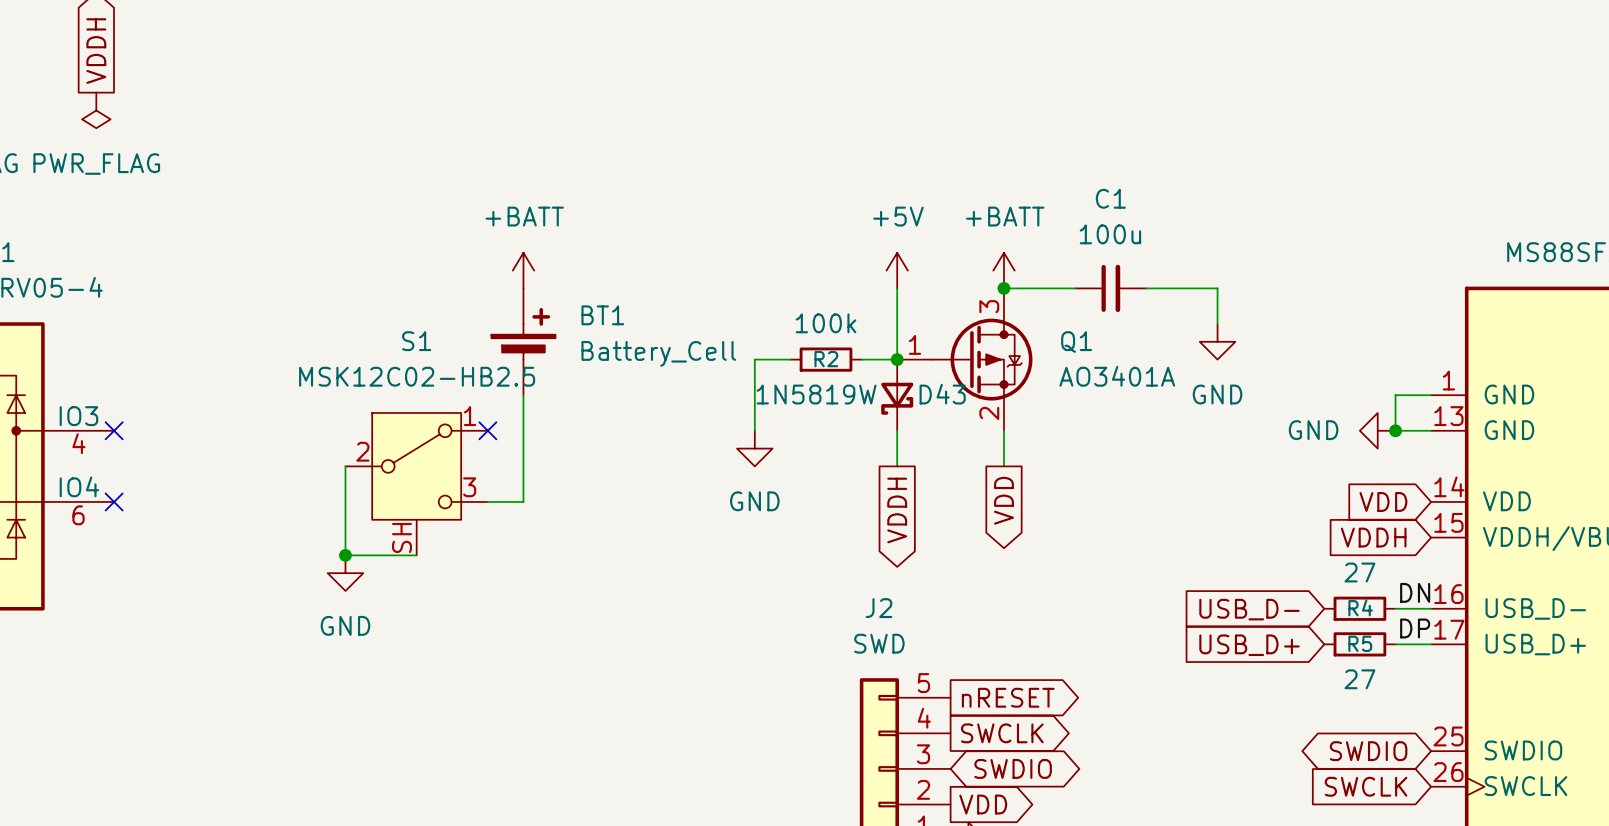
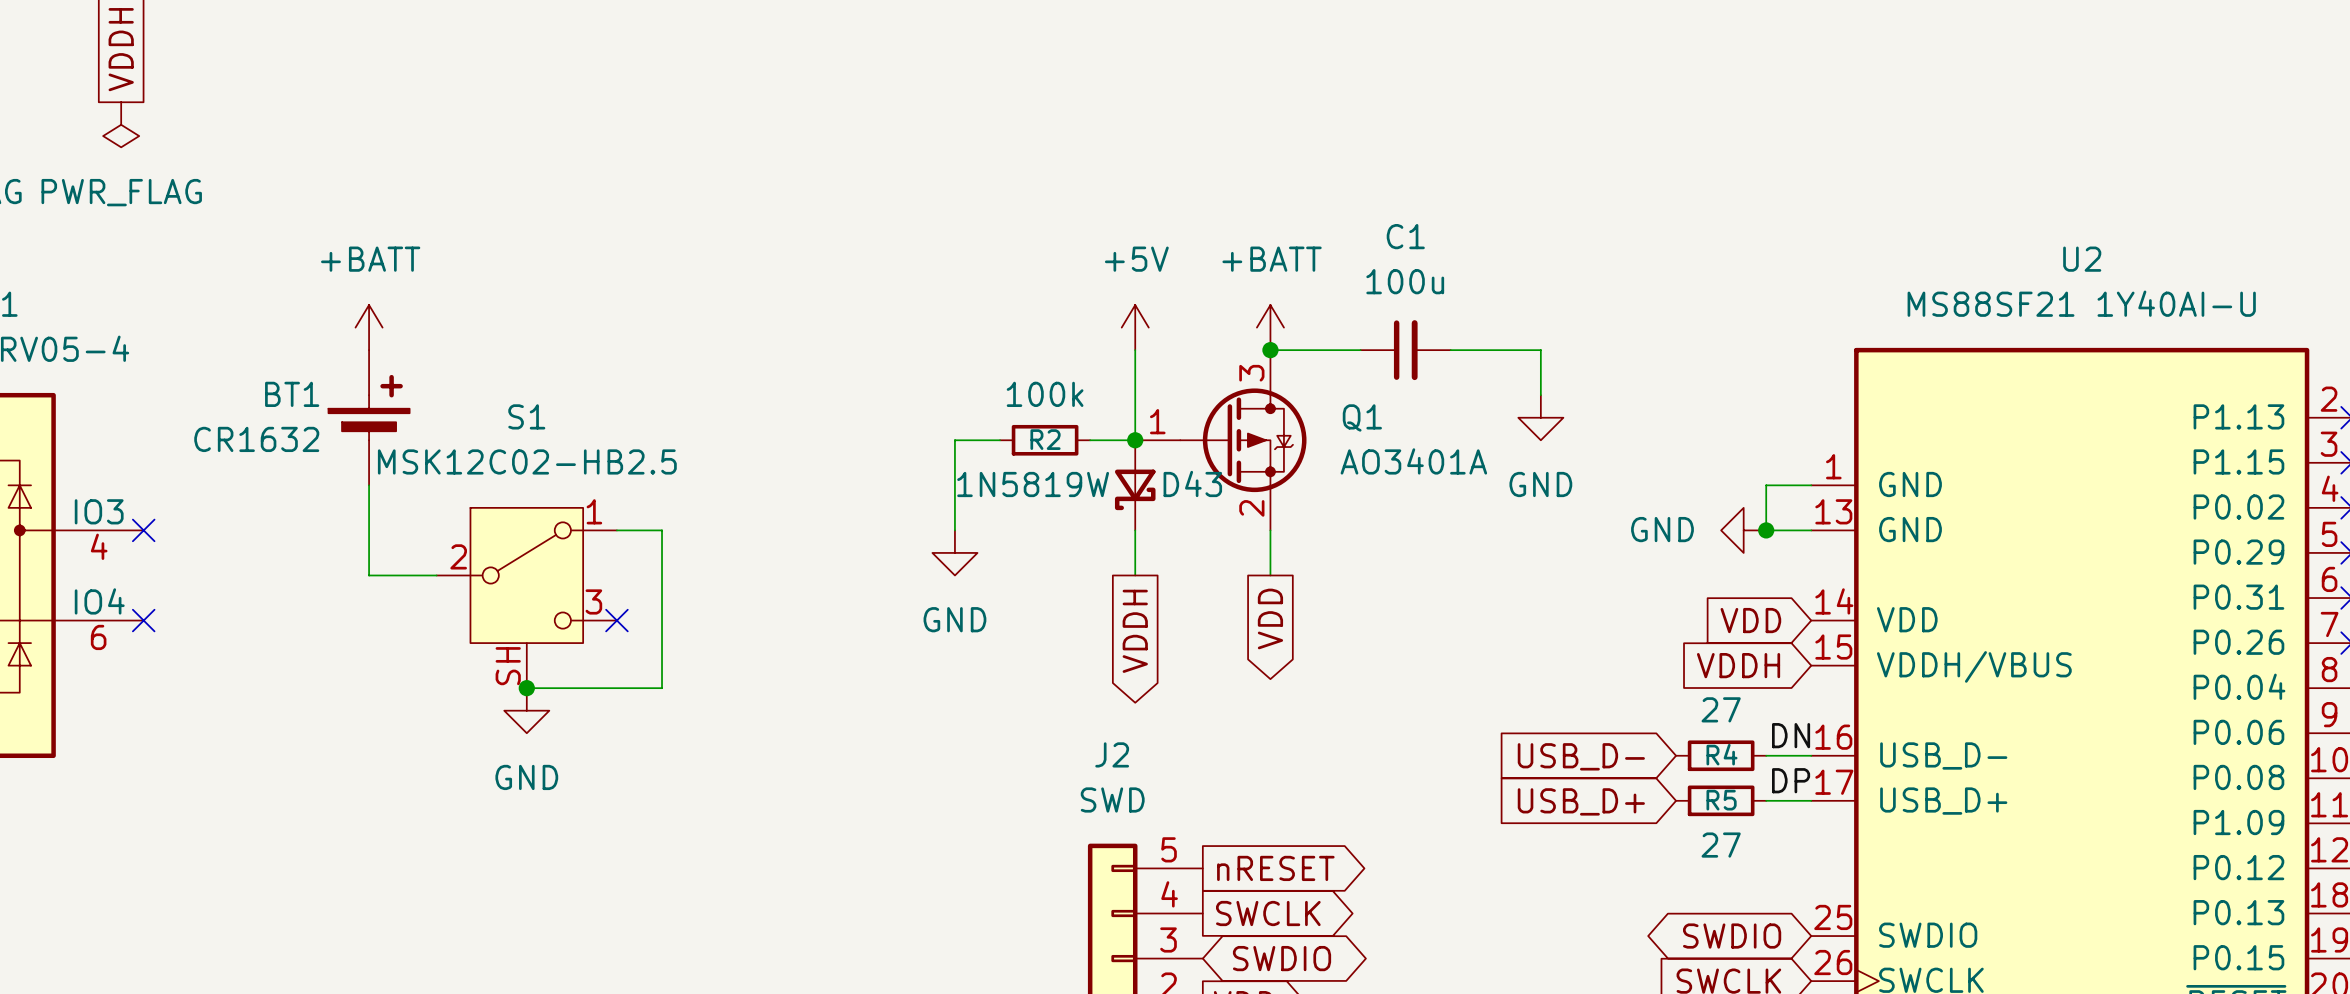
power symbol position: +BATT (523, 270) -> +BATT (369, 327)
BT1 name position: BT1 (602, 315) -> BT1 (292, 394)
BT1 position: (523, 341) -> (369, 417)
BT1 value: Battery_Cell (658, 353) -> CR1632 (256, 439)
wire: (523, 395) (523, 430) -> (616, 530) (662, 530)
no-connect mark position: (487, 430) -> (616, 620)
wire: (345, 466) (345, 555) (416, 555) -> (436, 575) (369, 575) (369, 485)
wire: (487, 501) (523, 501) -> (526, 688) (662, 688) (662, 620)
junction position: (345, 555) -> (526, 688)
power symbol position: GND (345, 573) -> GND (526, 710)

